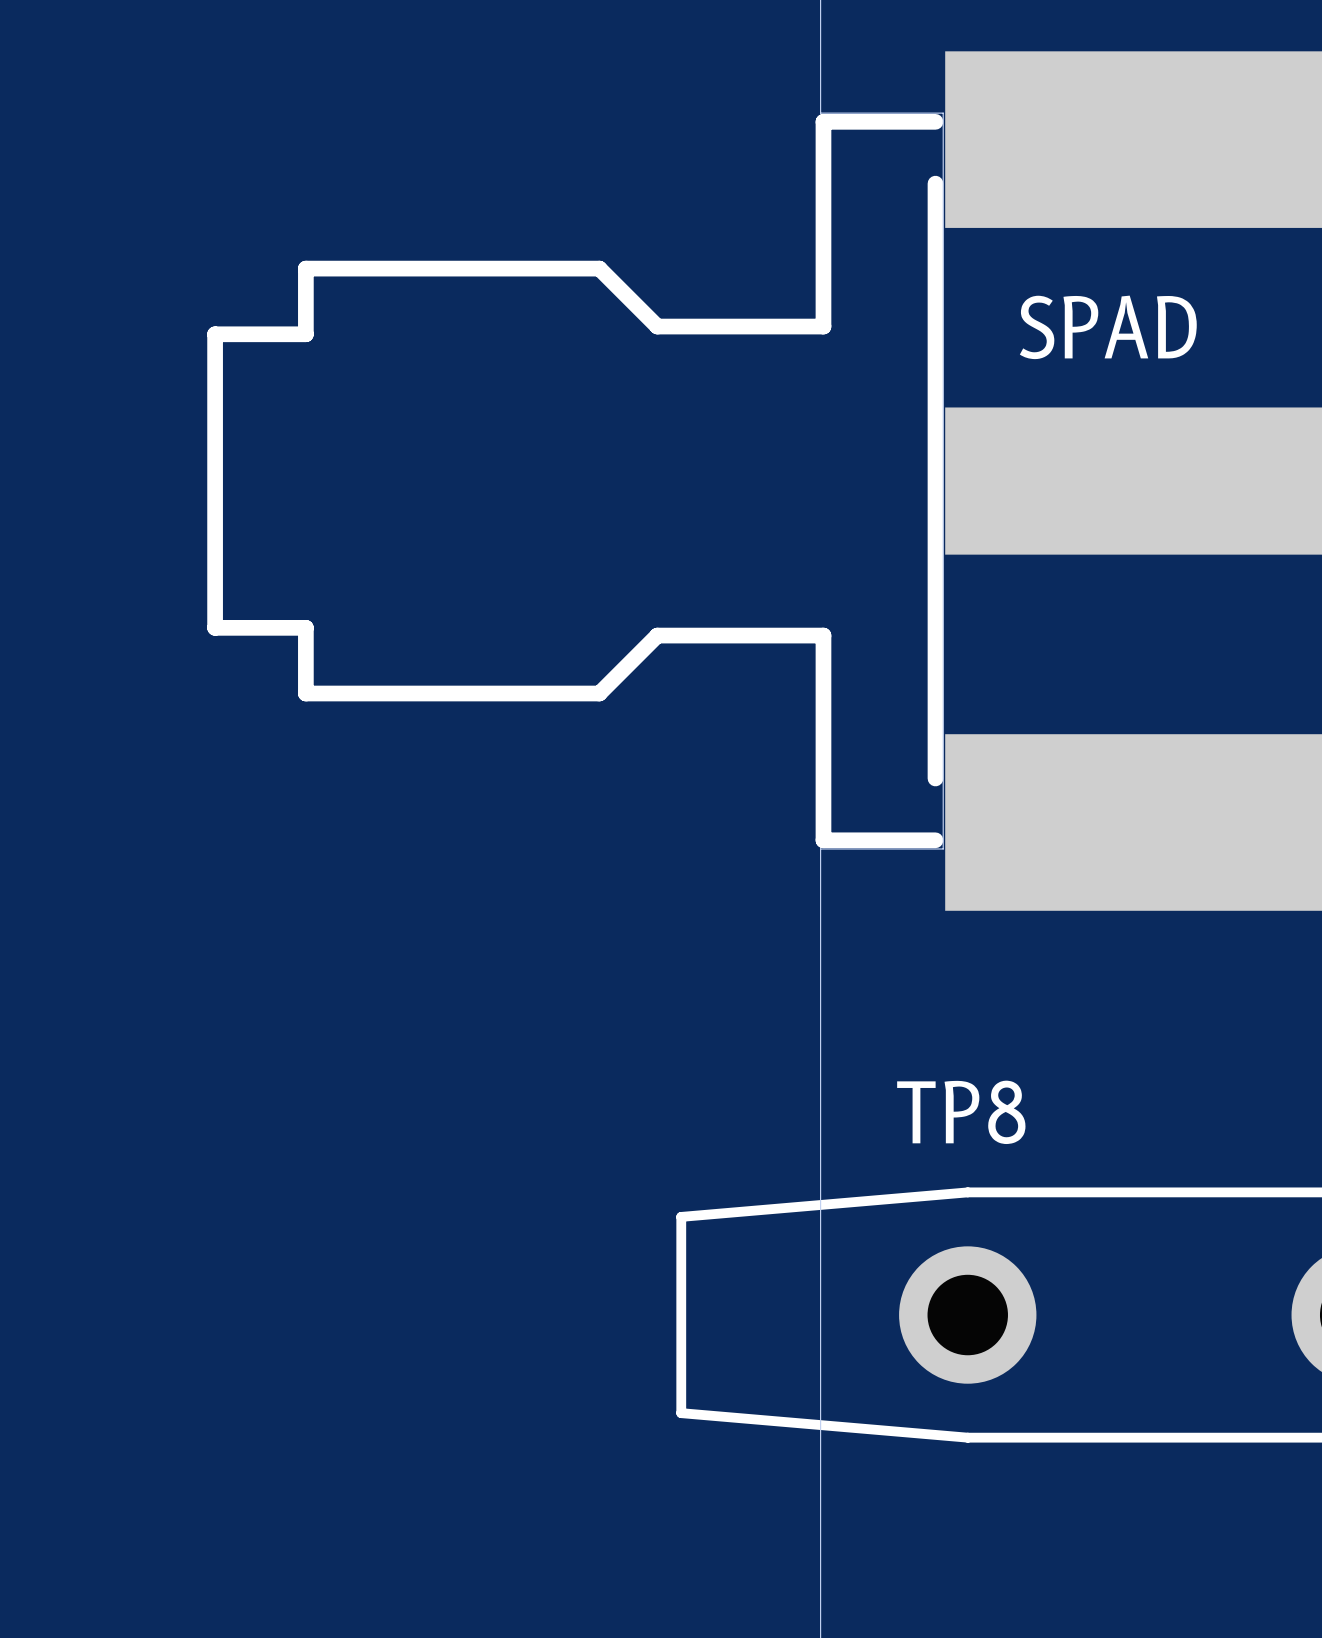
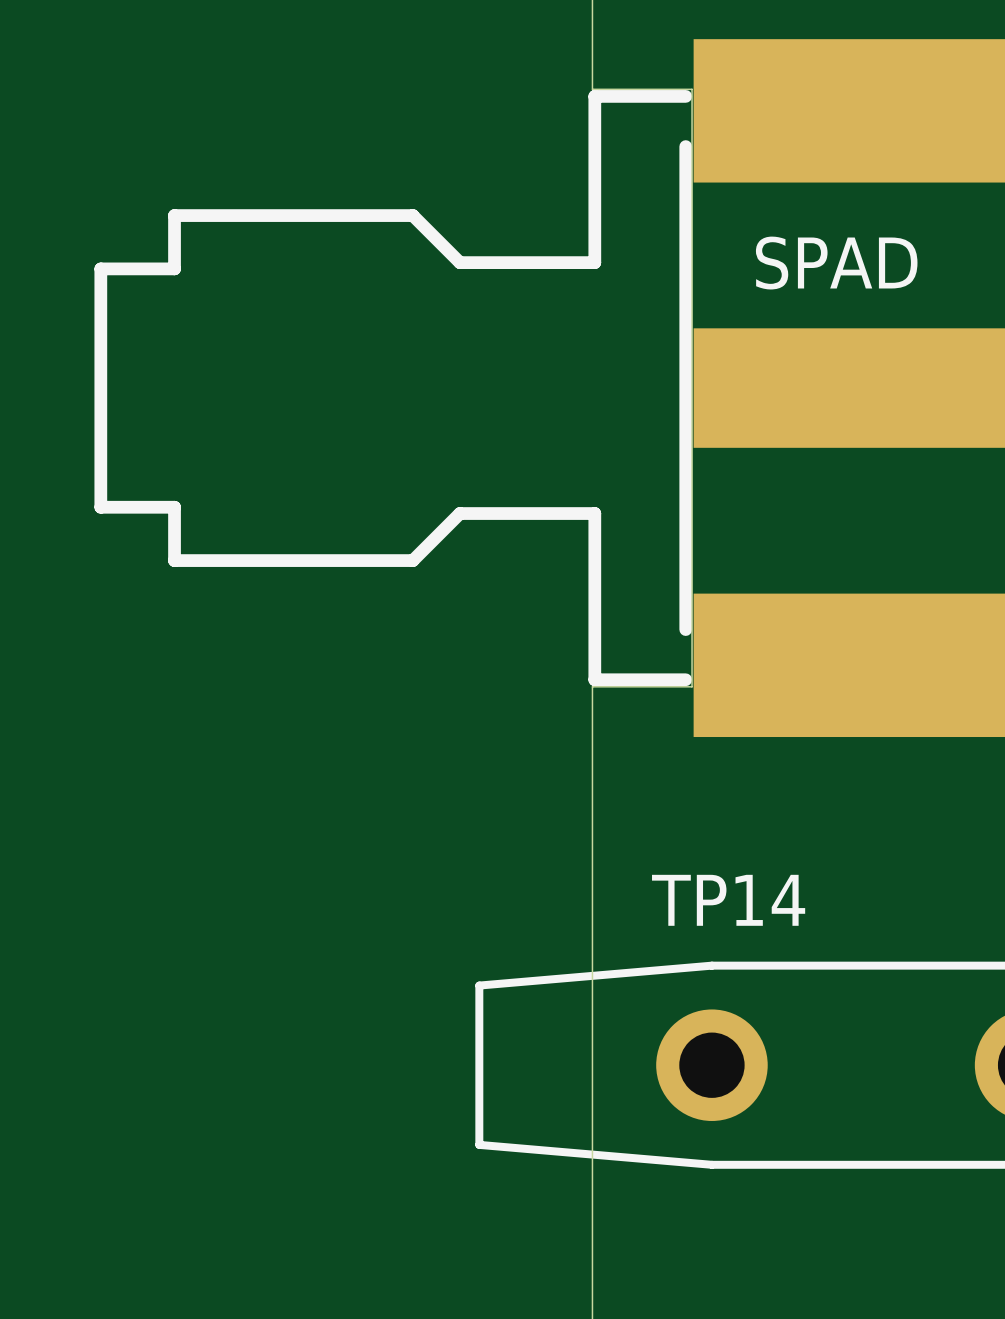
TP8 name: TP8 (961, 1112) -> TP14 (728, 900)

